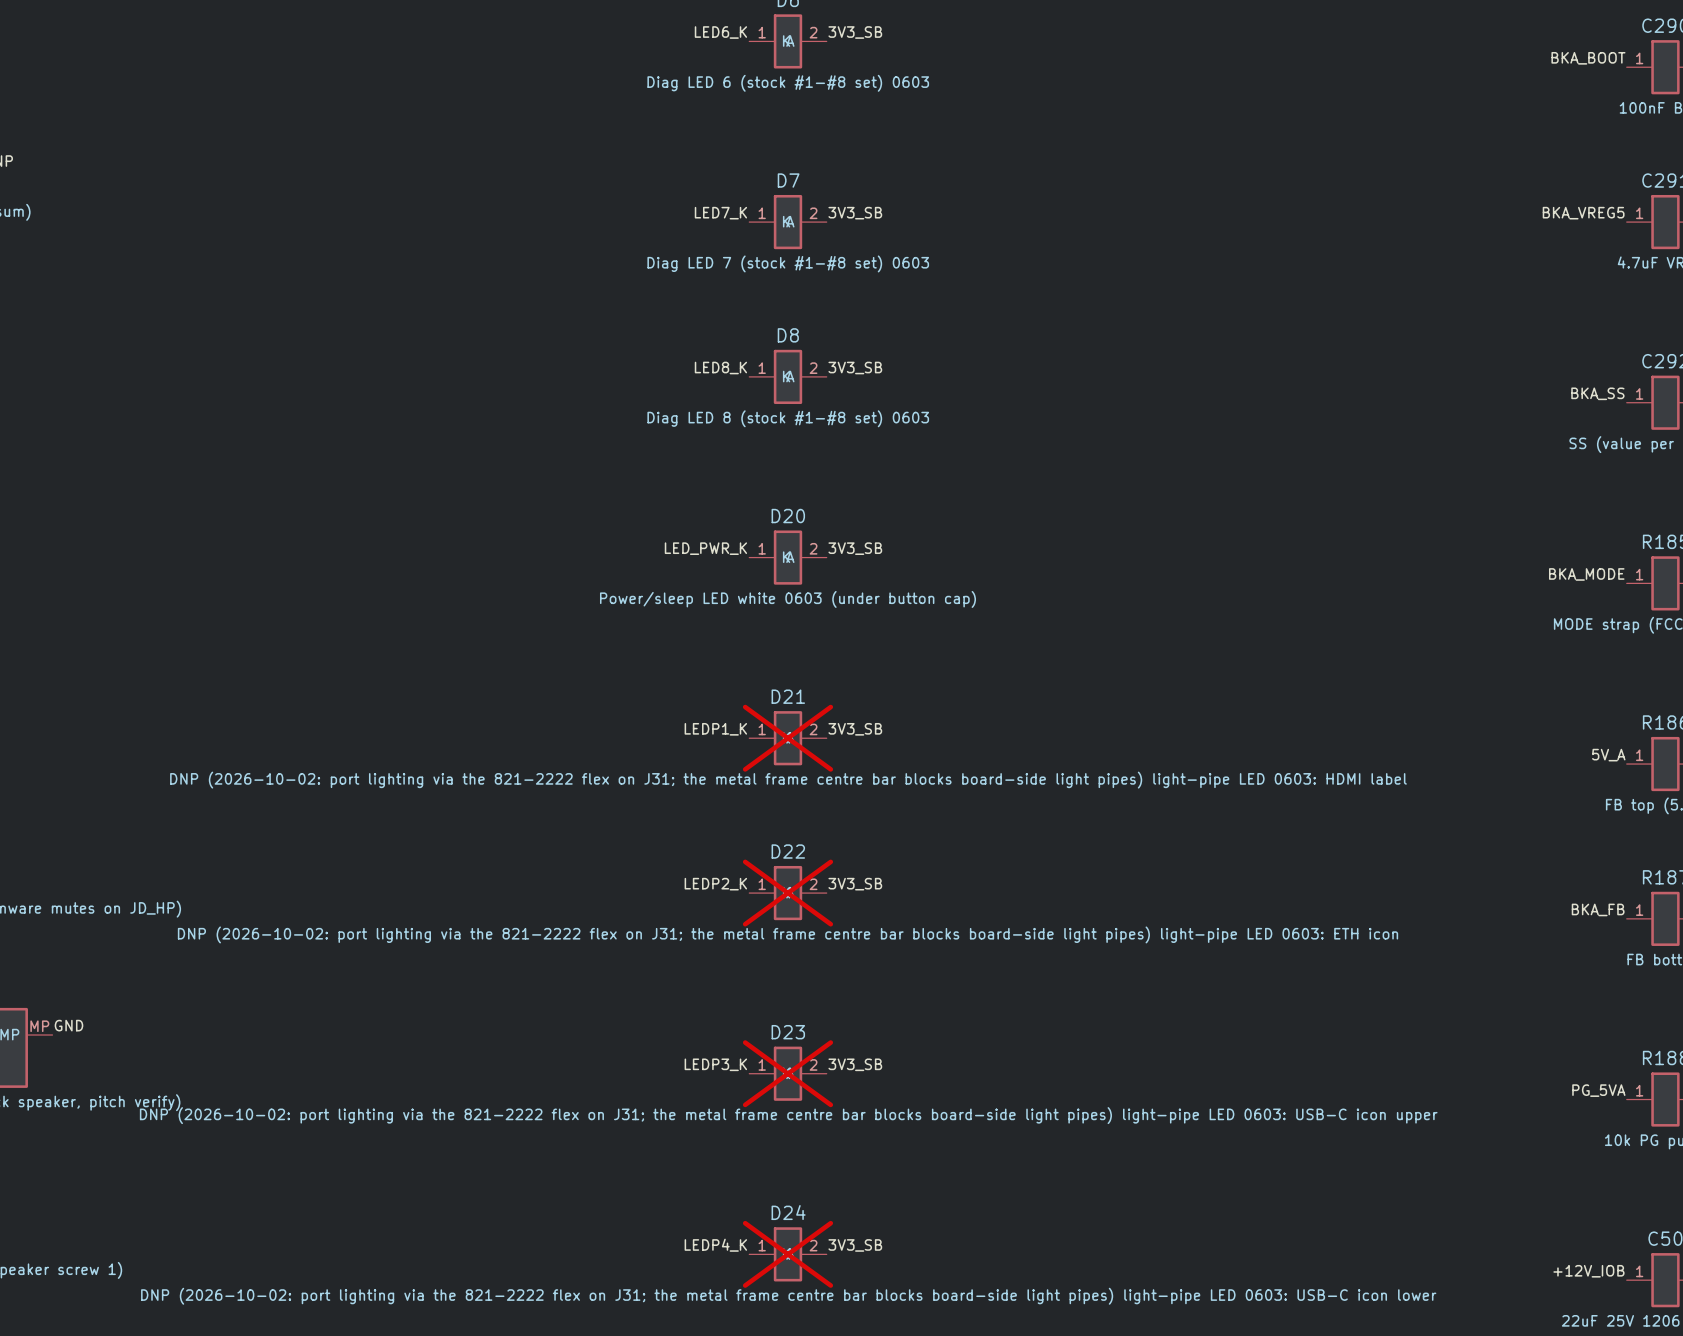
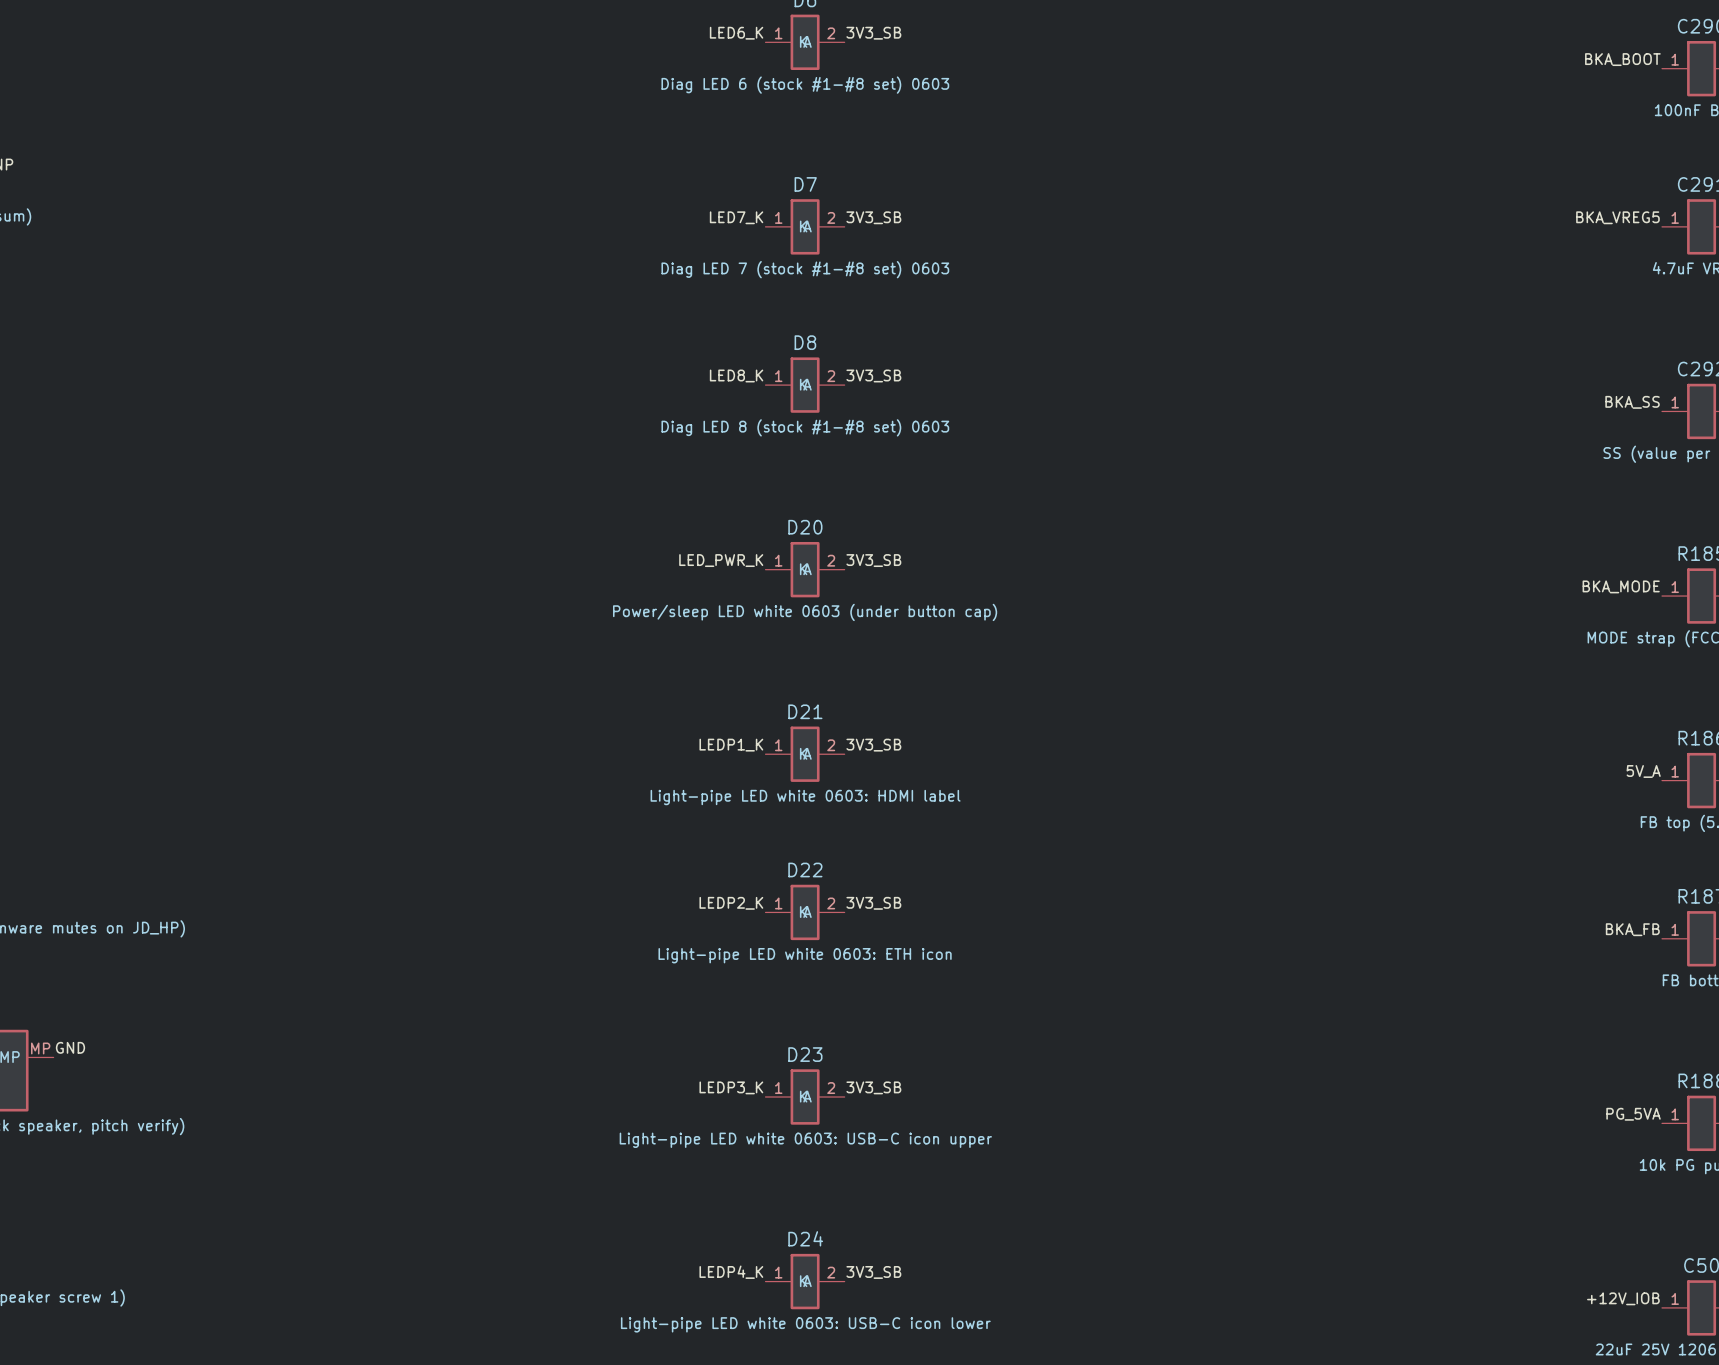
D21 do-not-place cross: (787, 738) -> none
D21 value: DNP (2026-10-02: port lighting via the 821-2222 flex on J31; the metal frame centre bar blocks board-side light pipes) light-pipe LED 0603: HDMI label (788, 780) -> Light-pipe LED white 0603: HDMI label (805, 797)
D22 do-not-place cross: (787, 893) -> none
D22 value: DNP (2026-10-02: port lighting via the 821-2222 flex on J31; the metal frame centre bar blocks board-side light pipes) light-pipe LED 0603: ETH icon (787, 934) -> Light-pipe LED white 0603: ETH icon (805, 955)
D23 do-not-place cross: (787, 1073) -> none
D23 value: DNP (2026-10-02: port lighting via the 821-2222 flex on J31; the metal frame centre bar blocks board-side light pipes) light-pipe LED 0603: USB-C icon upper (788, 1115) -> Light-pipe LED white 0603: USB-C icon upper (805, 1140)
D24 do-not-place cross: (787, 1254) -> none
D24 value: DNP (2026-10-02: port lighting via the 821-2222 flex on J31; the metal frame centre bar blocks board-side light pipes) light-pipe LED 0603: USB-C icon lower (788, 1296) -> Light-pipe LED white 0603: USB-C icon lower (805, 1324)

